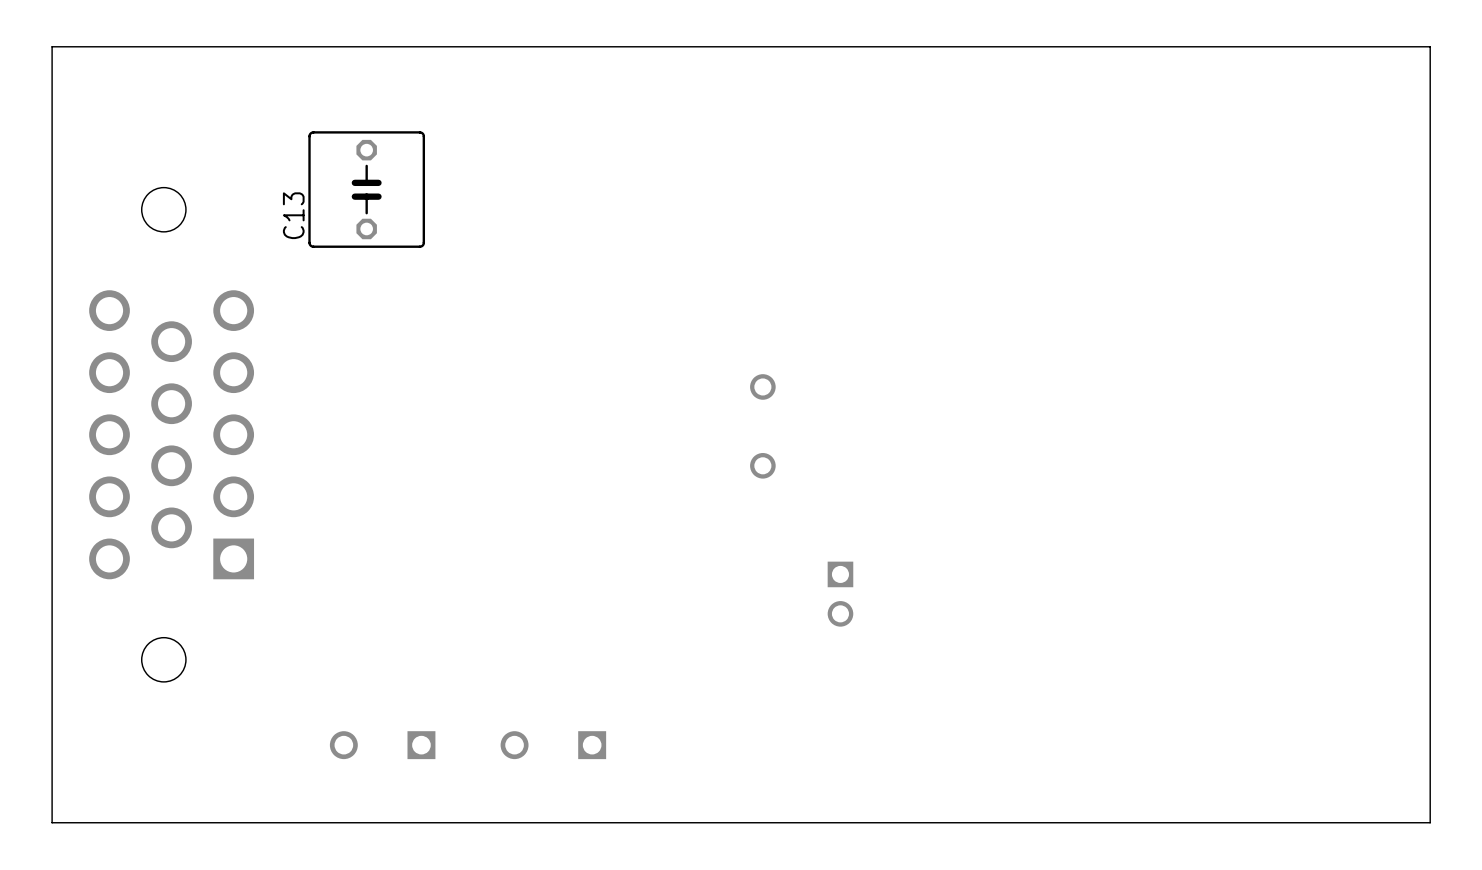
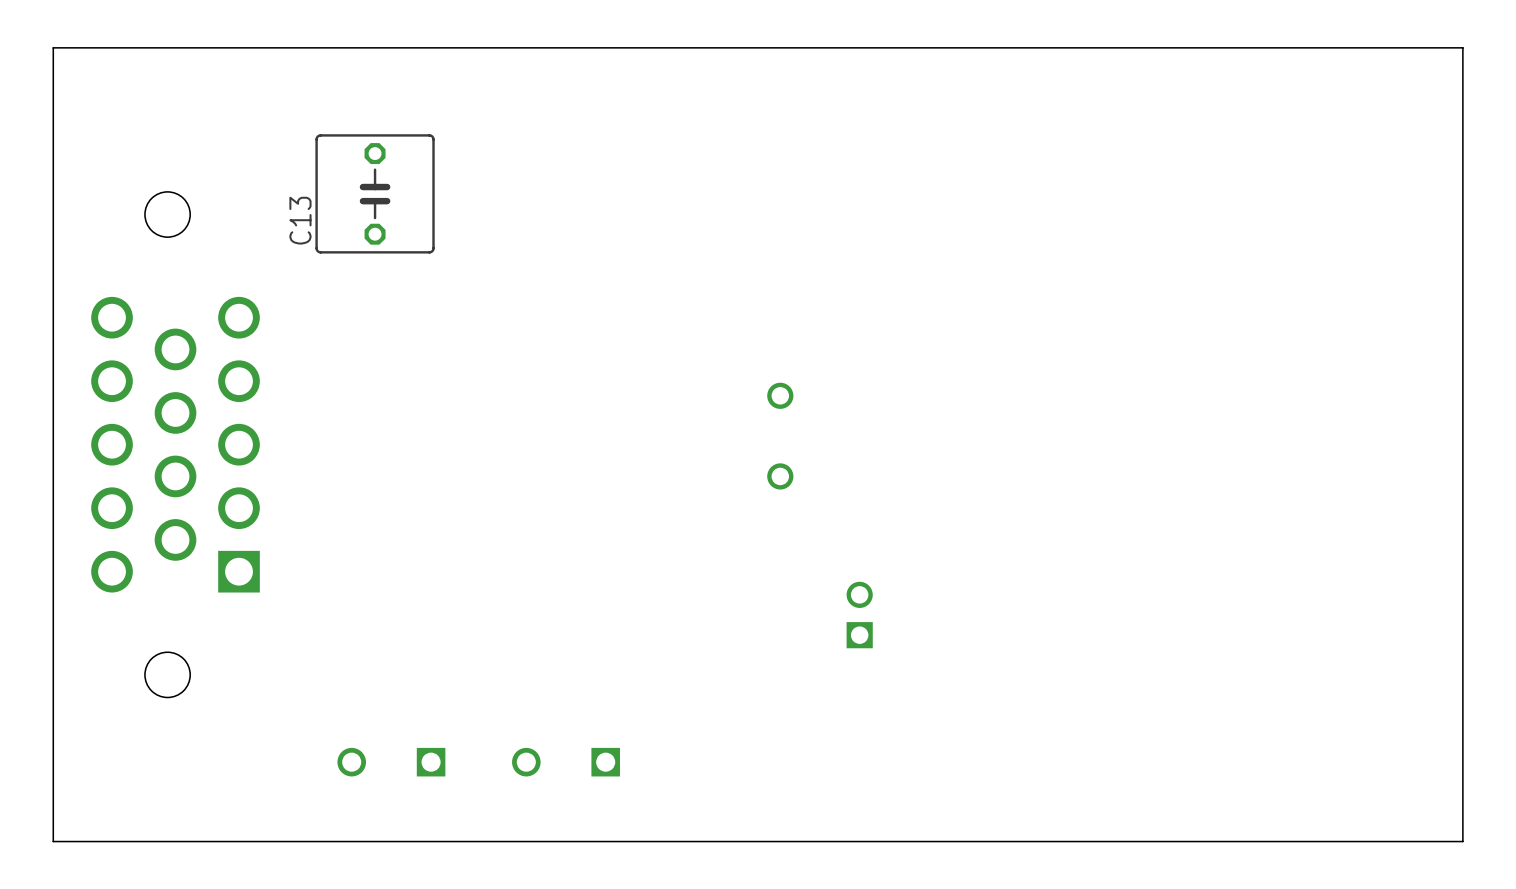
part rotation: 0° (840, 594) -> 180° (859, 615)

